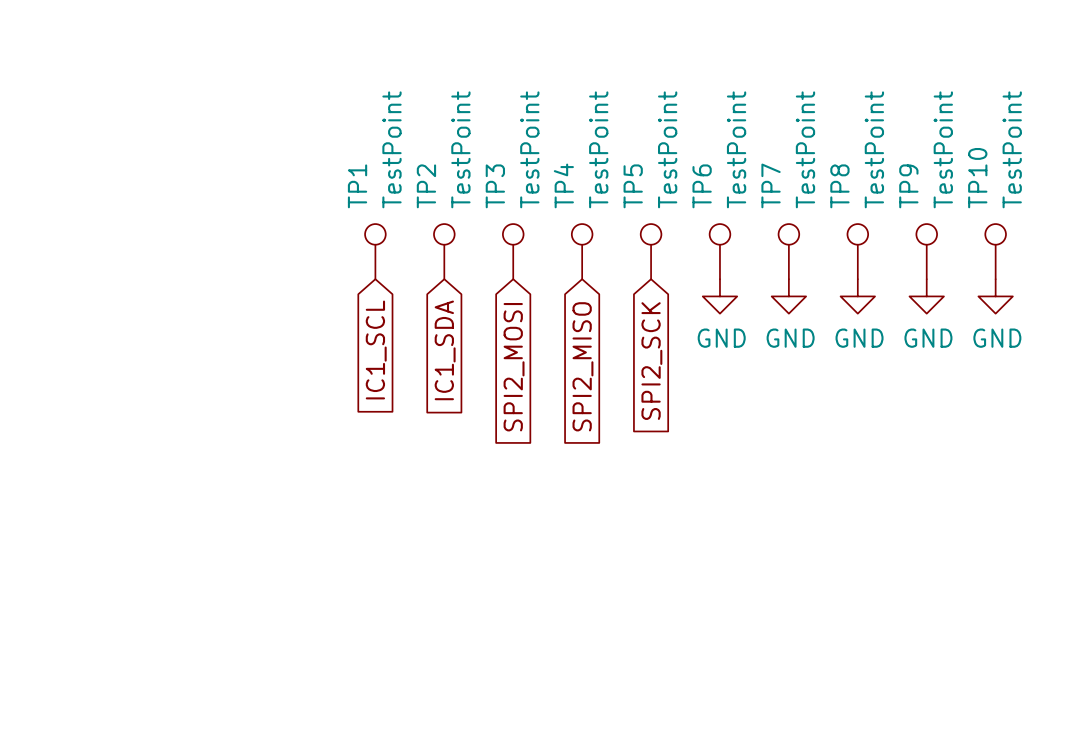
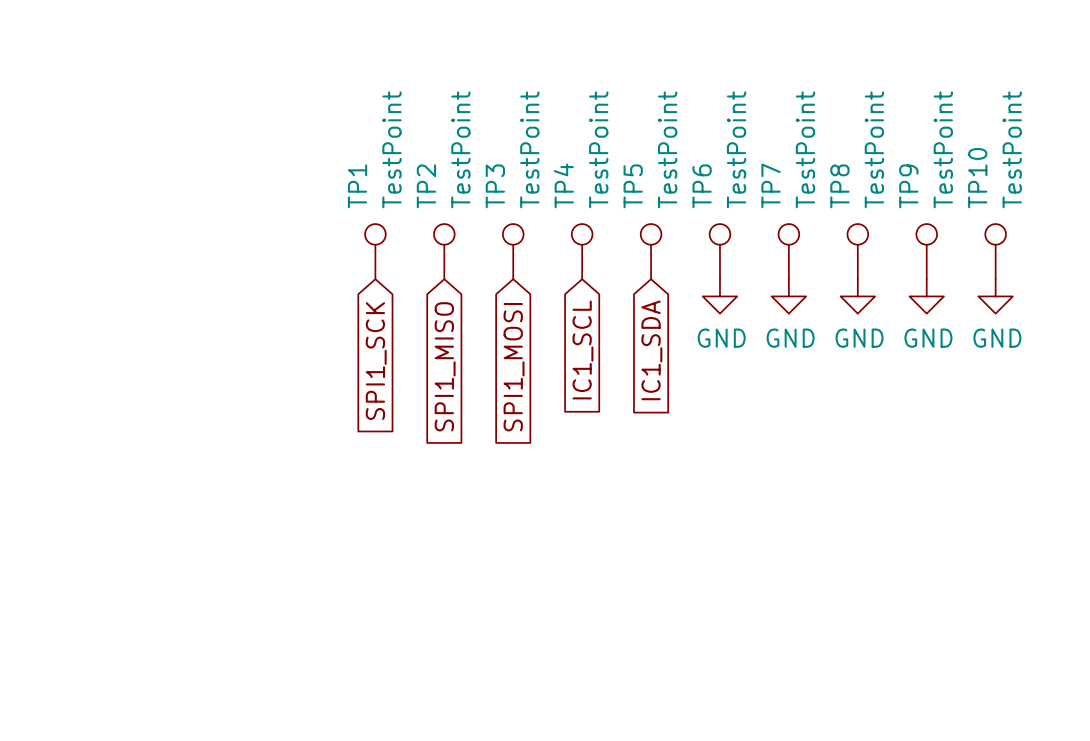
global label: IC1_SCL (376, 349) -> SPI1_SCK (376, 361)
global label: IC1_SDA (445, 350) -> SPI1_MISO (445, 366)
global label: SPI2_SCK (651, 361) -> IC1_SDA (651, 350)
global label: SPI2_MISO (582, 366) -> IC1_SCL (582, 349)
global label: SPI2_MOSI (514, 367) -> SPI1_MOSI (514, 367)

